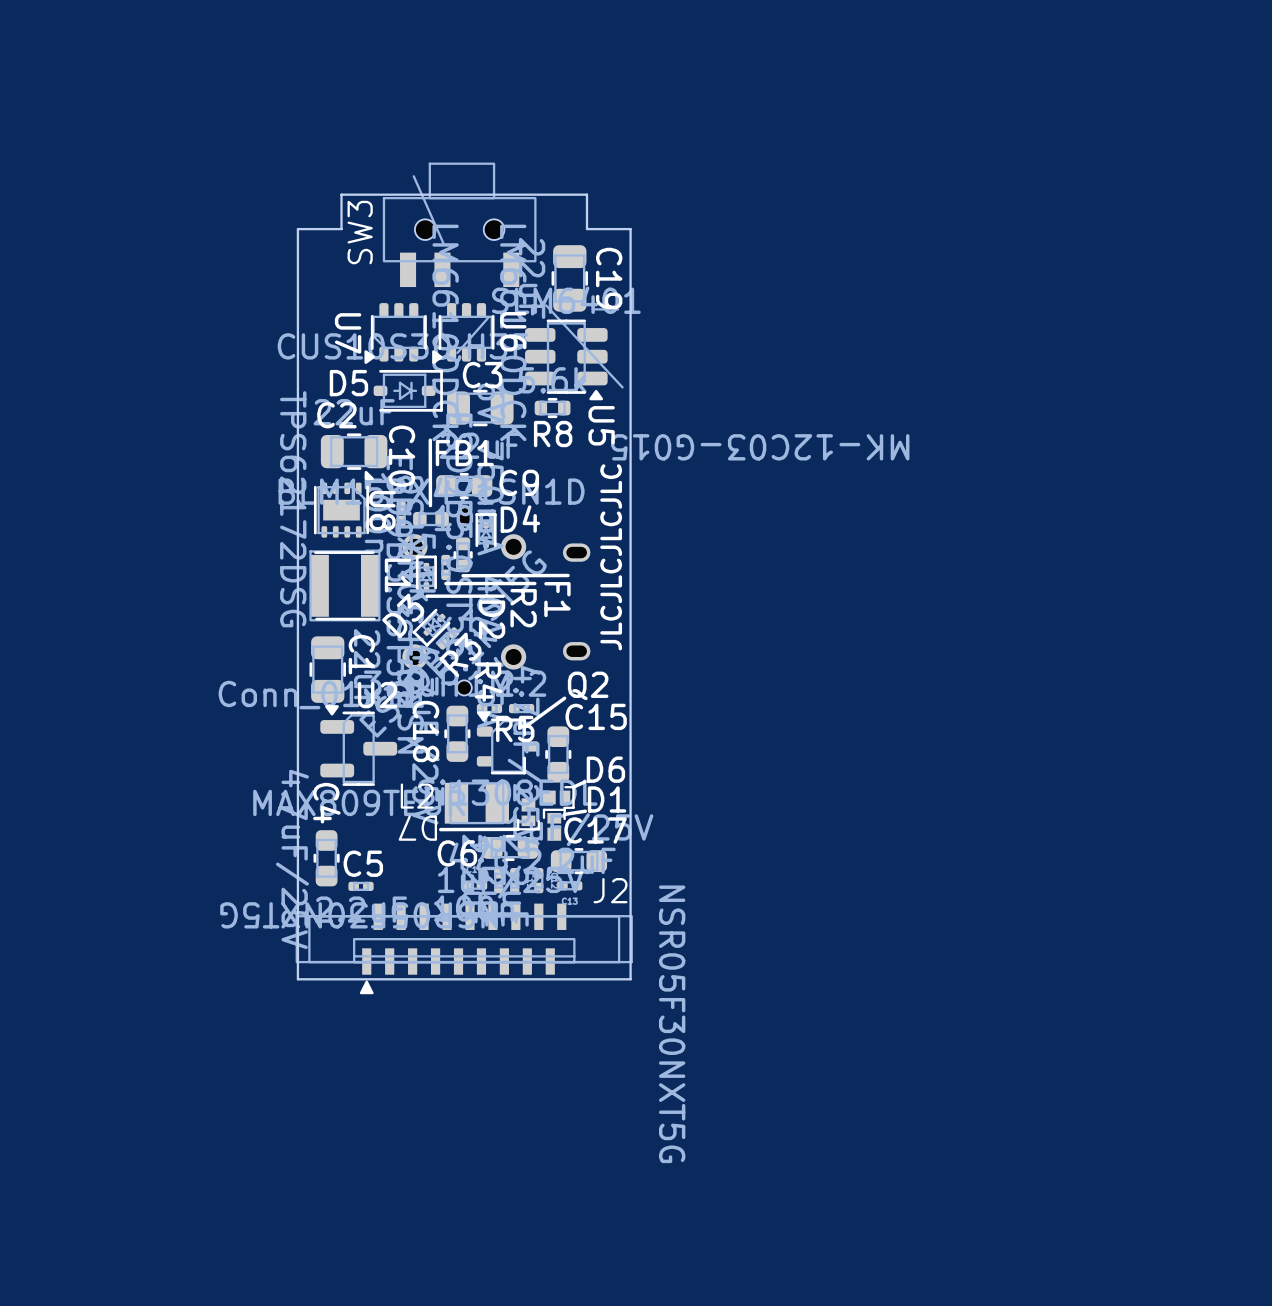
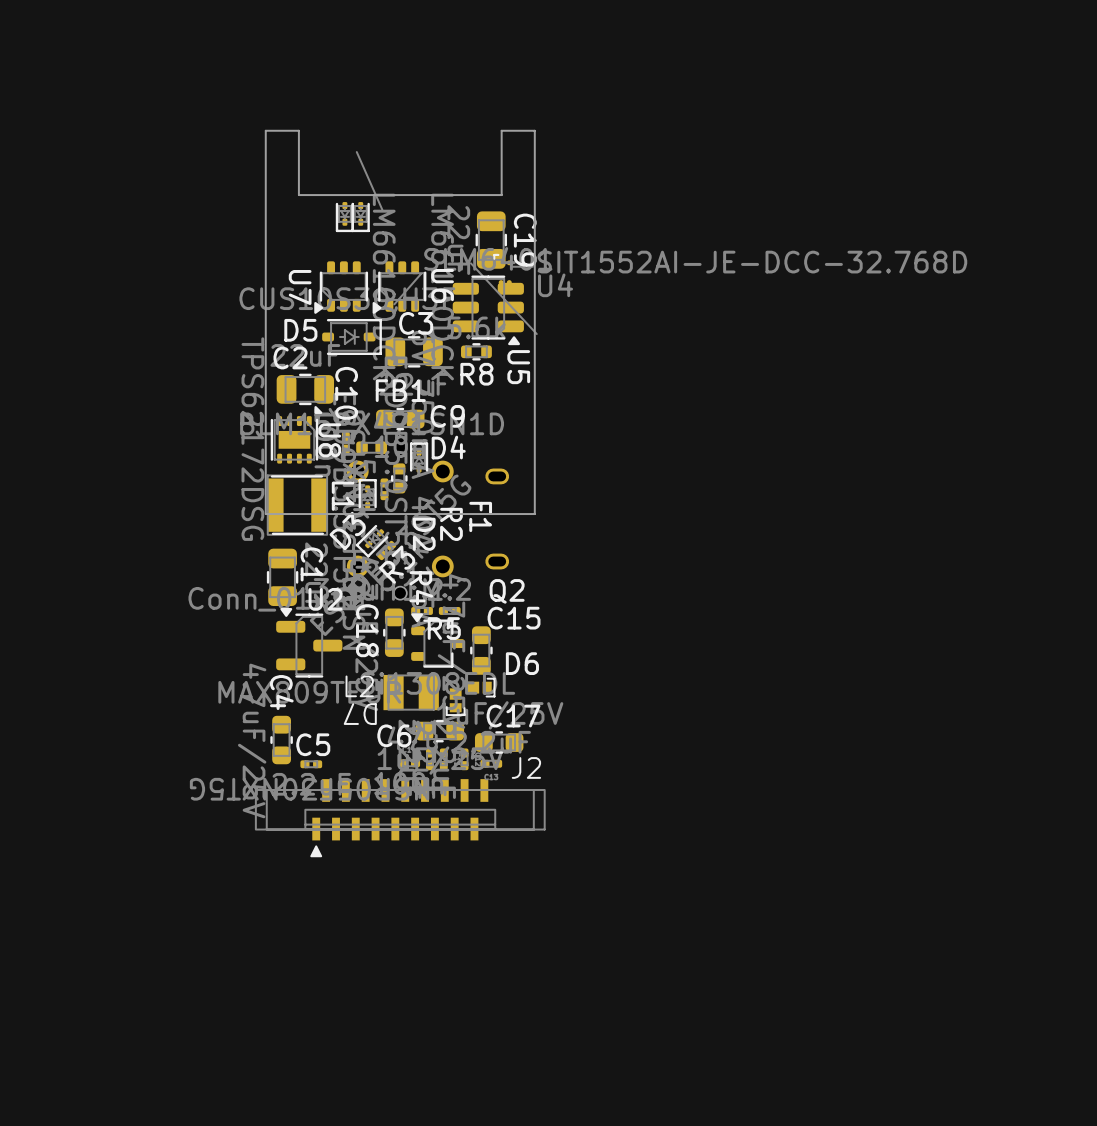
board edge: none -> (534, 130) (501, 130) (501, 195) (298, 195) (298, 130) (265, 130) (265, 514) (534, 514) (534, 130)
board edge: (586, 194) (341, 194) (341, 229) (297, 229) (297, 979) (630, 979) (630, 229) (586, 229) (586, 194) -> none
SW3: MK-12C03-G015 (459, 224) -> none
part: none -> (344, 217)
part: none -> (360, 217)
U4: none -> SIT1552AI-JE-DCC-32.768D (502, 269)
line: (430, 440) (430, 505) -> none
text: JLCJLCJLCJLC (611, 557) -> none
line: (568, 575) (463, 575) -> none
line: (534, 583) (445, 583) -> none
line: (503, 596) (426, 596) -> none
line: (564, 698) (524, 727) -> none
line: (584, 781) (573, 787) -> none
line: (585, 811) (564, 814) -> none
D1: NSR05F30NXT5G (554, 824) -> none
line: (518, 829) (440, 829) -> none

